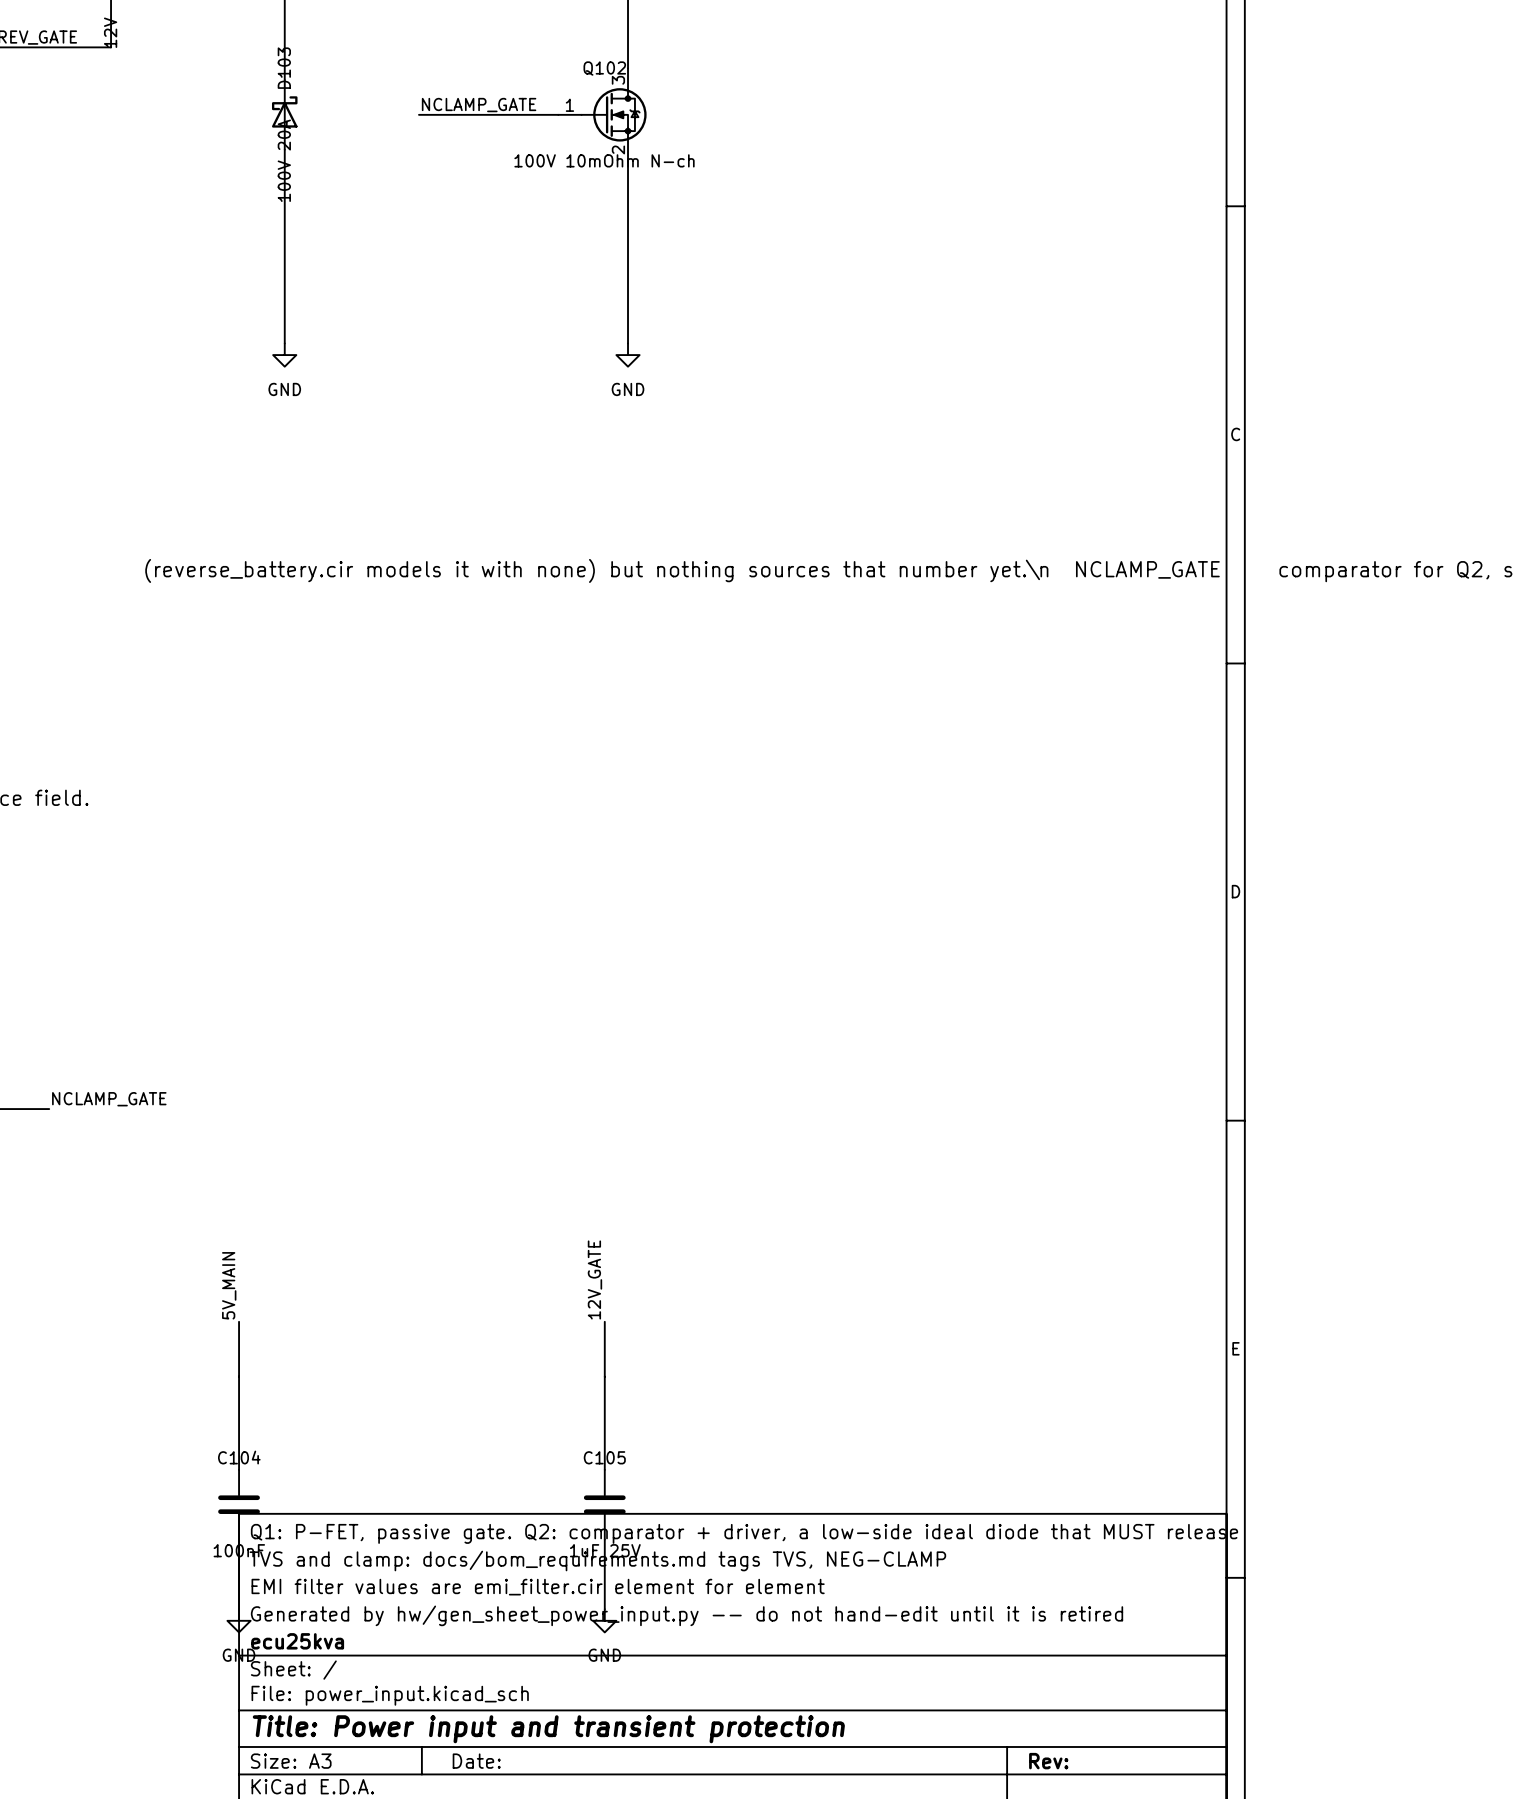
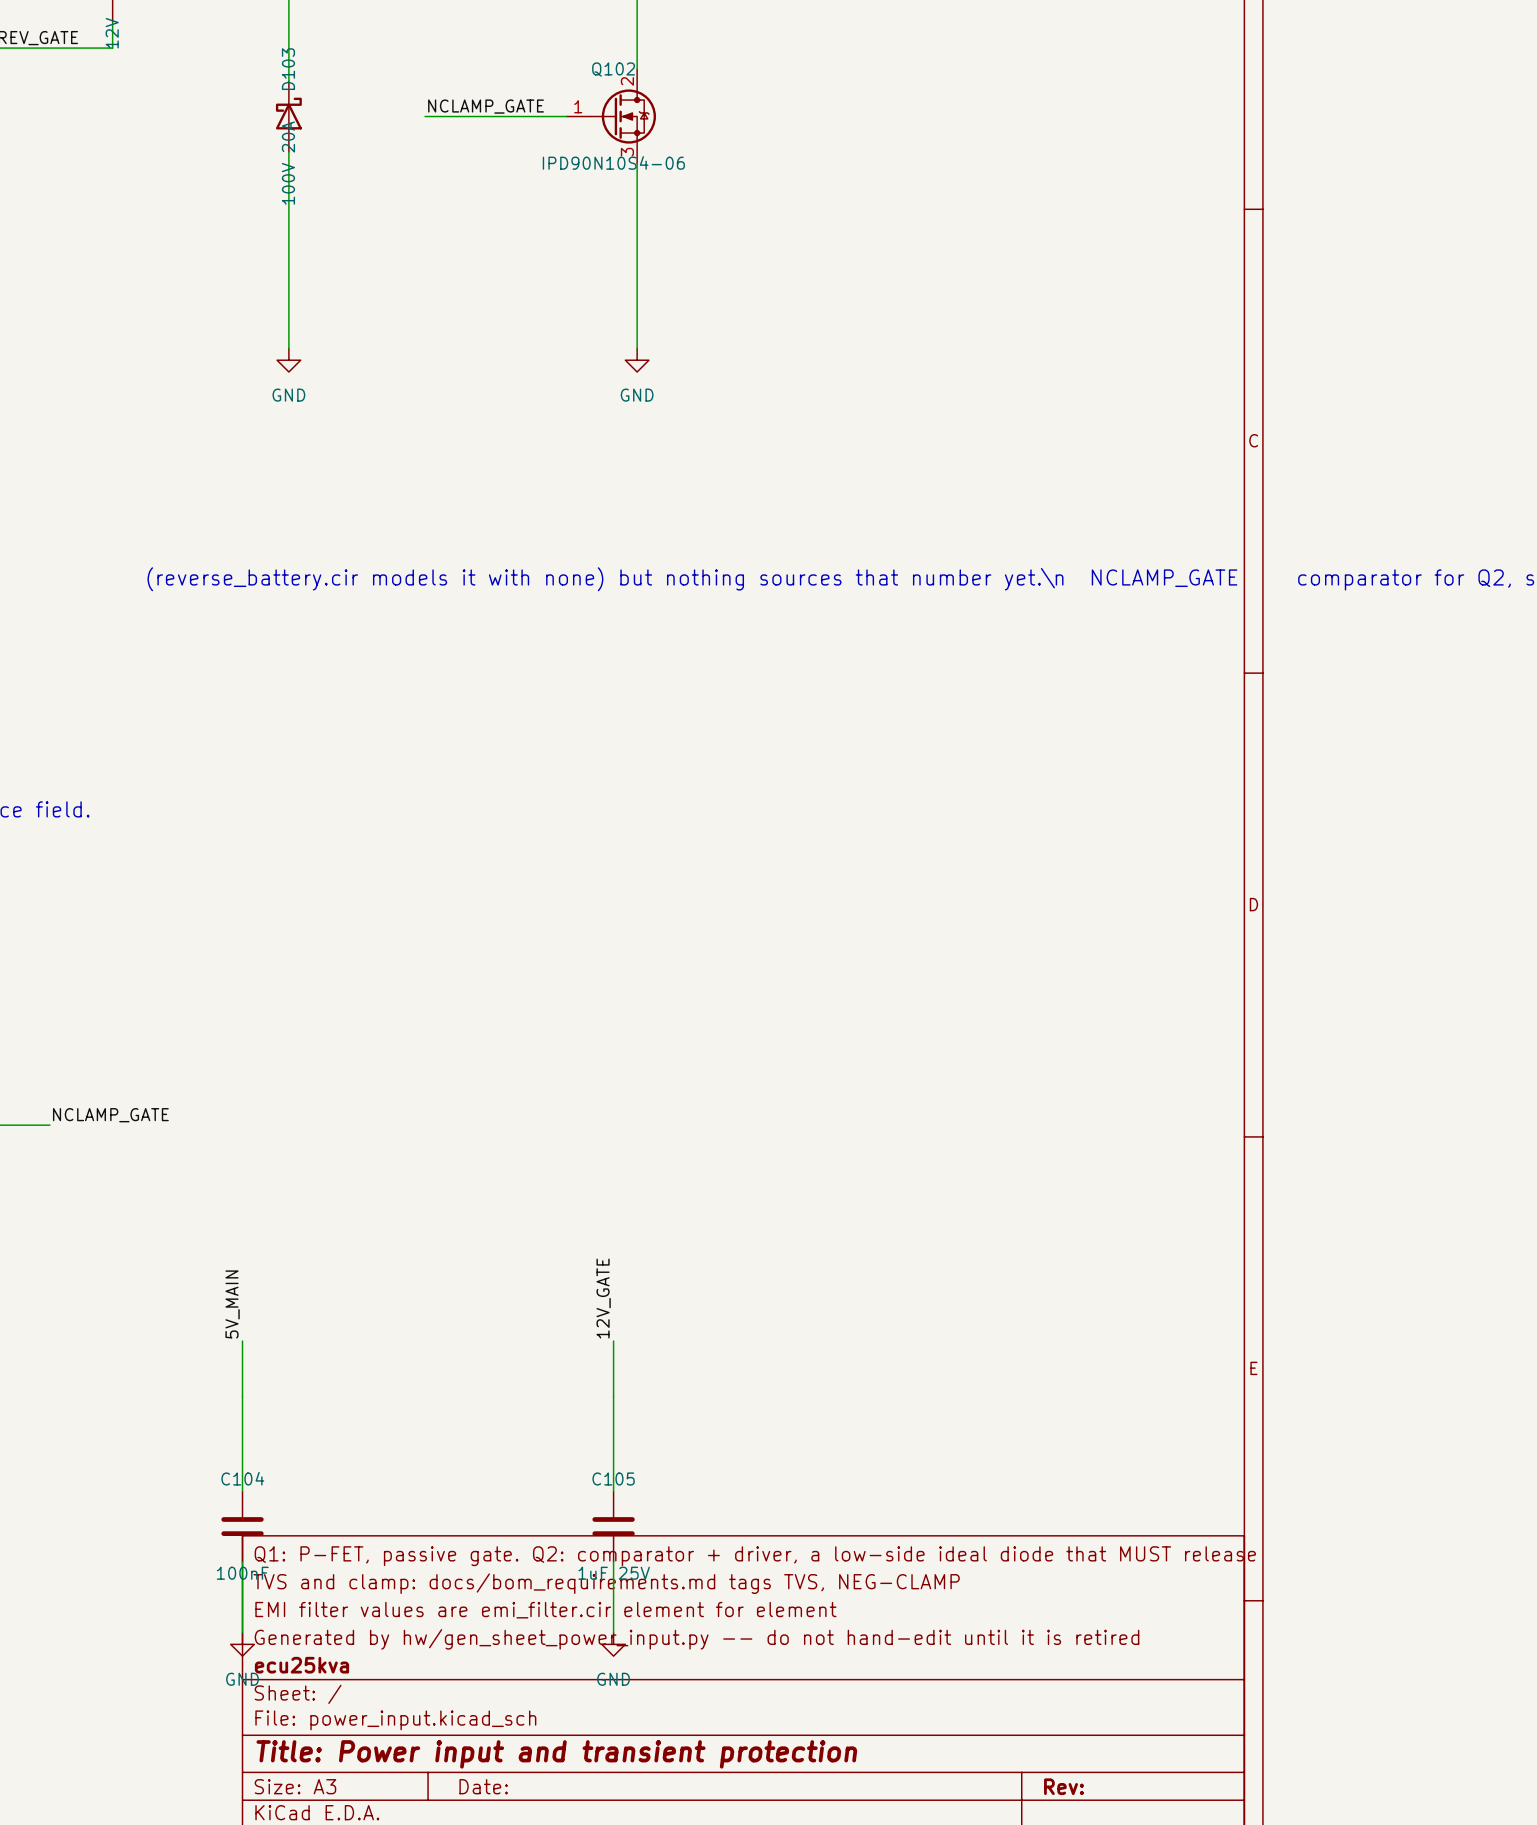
Q102 pin number: 3 (618, 80) -> 2 (627, 81)
Q102 pin number: 2 (618, 149) -> 3 (627, 152)
Q102 value: 100V 10mOhm N-ch (604, 160) -> IPD90N10S4-06 (613, 162)

